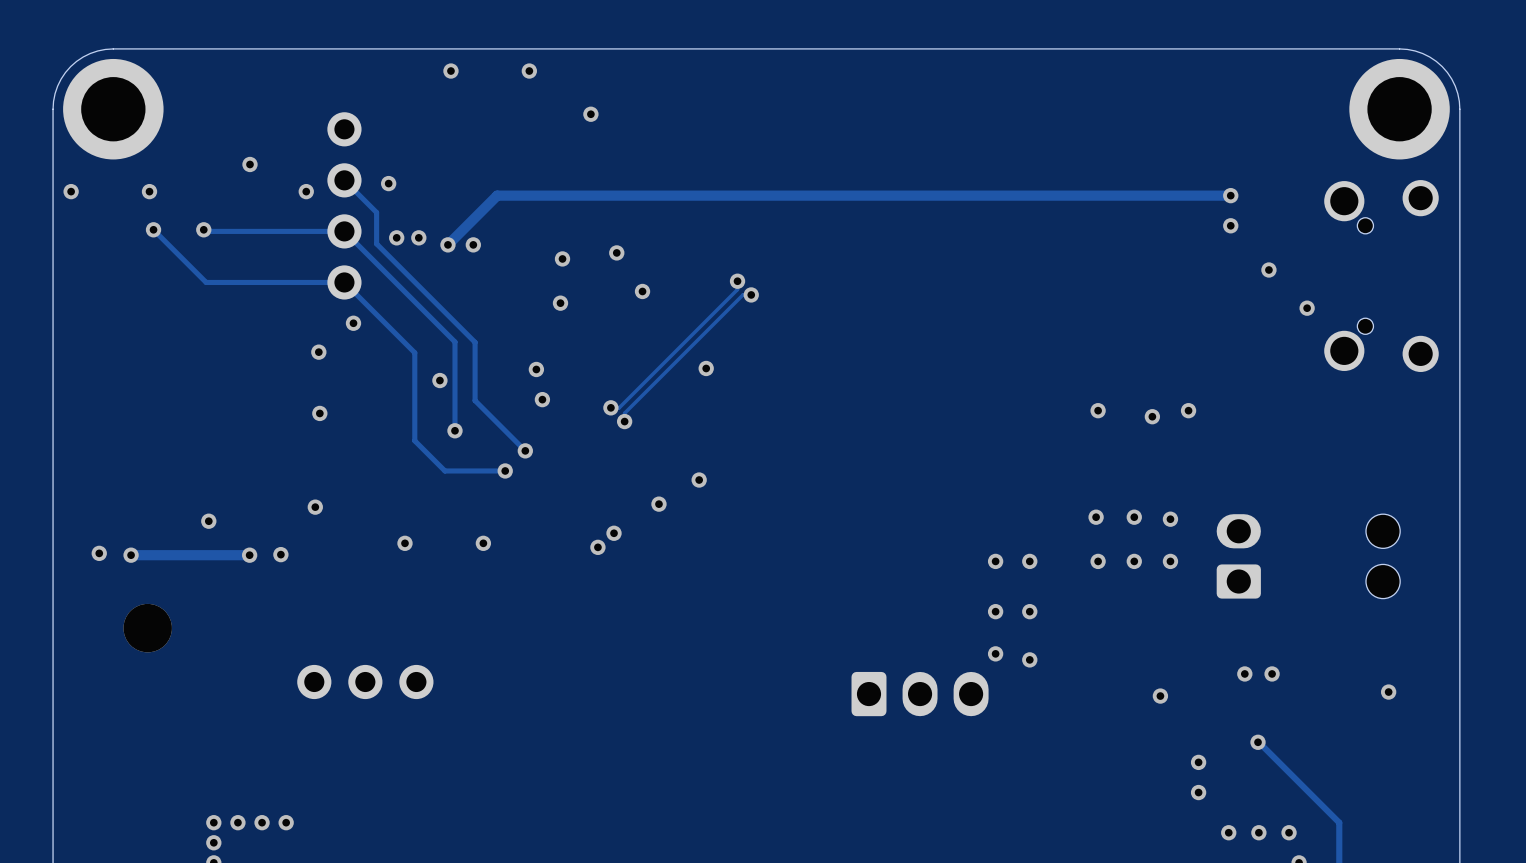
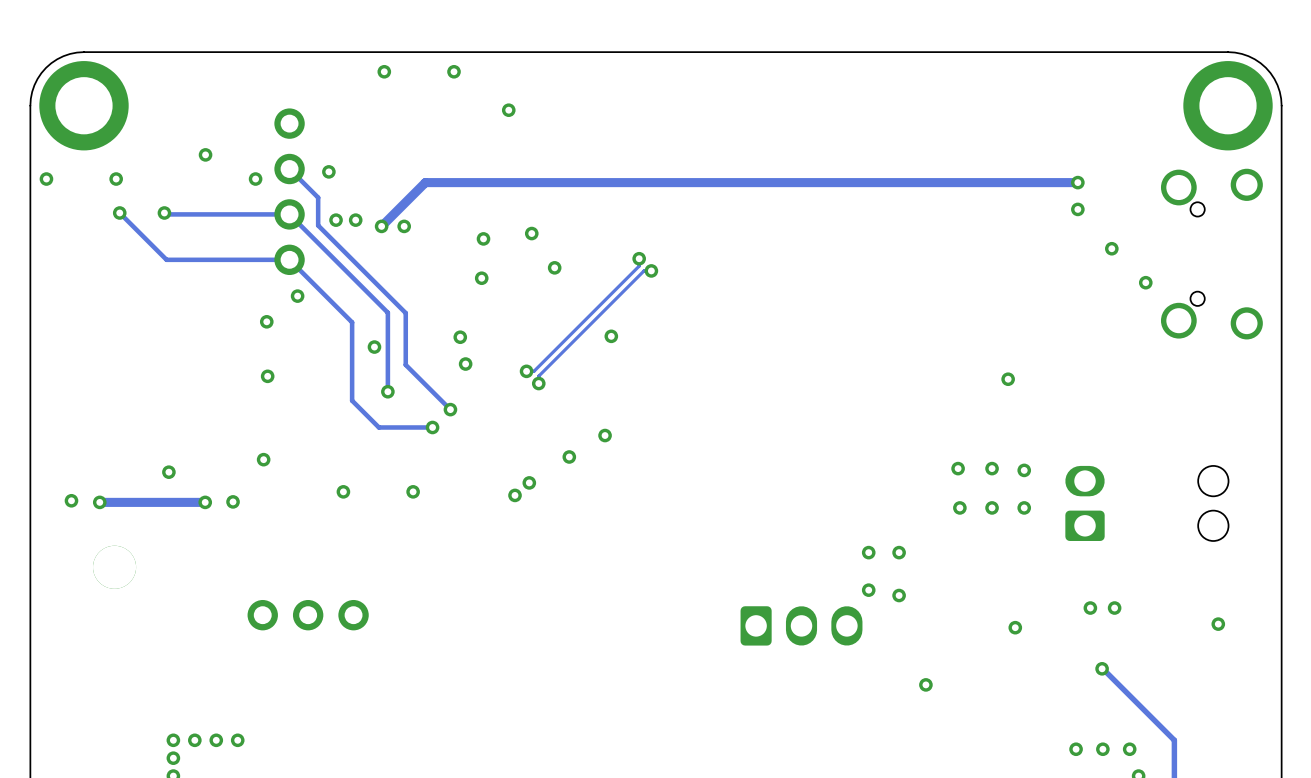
via: (1098, 410) -> none
via: (1188, 410) -> none
via: (995, 561) -> none
via: (1029, 561) -> none
via: none -> (925, 684)
via: (1198, 762) -> none
via: (1198, 792) -> none

